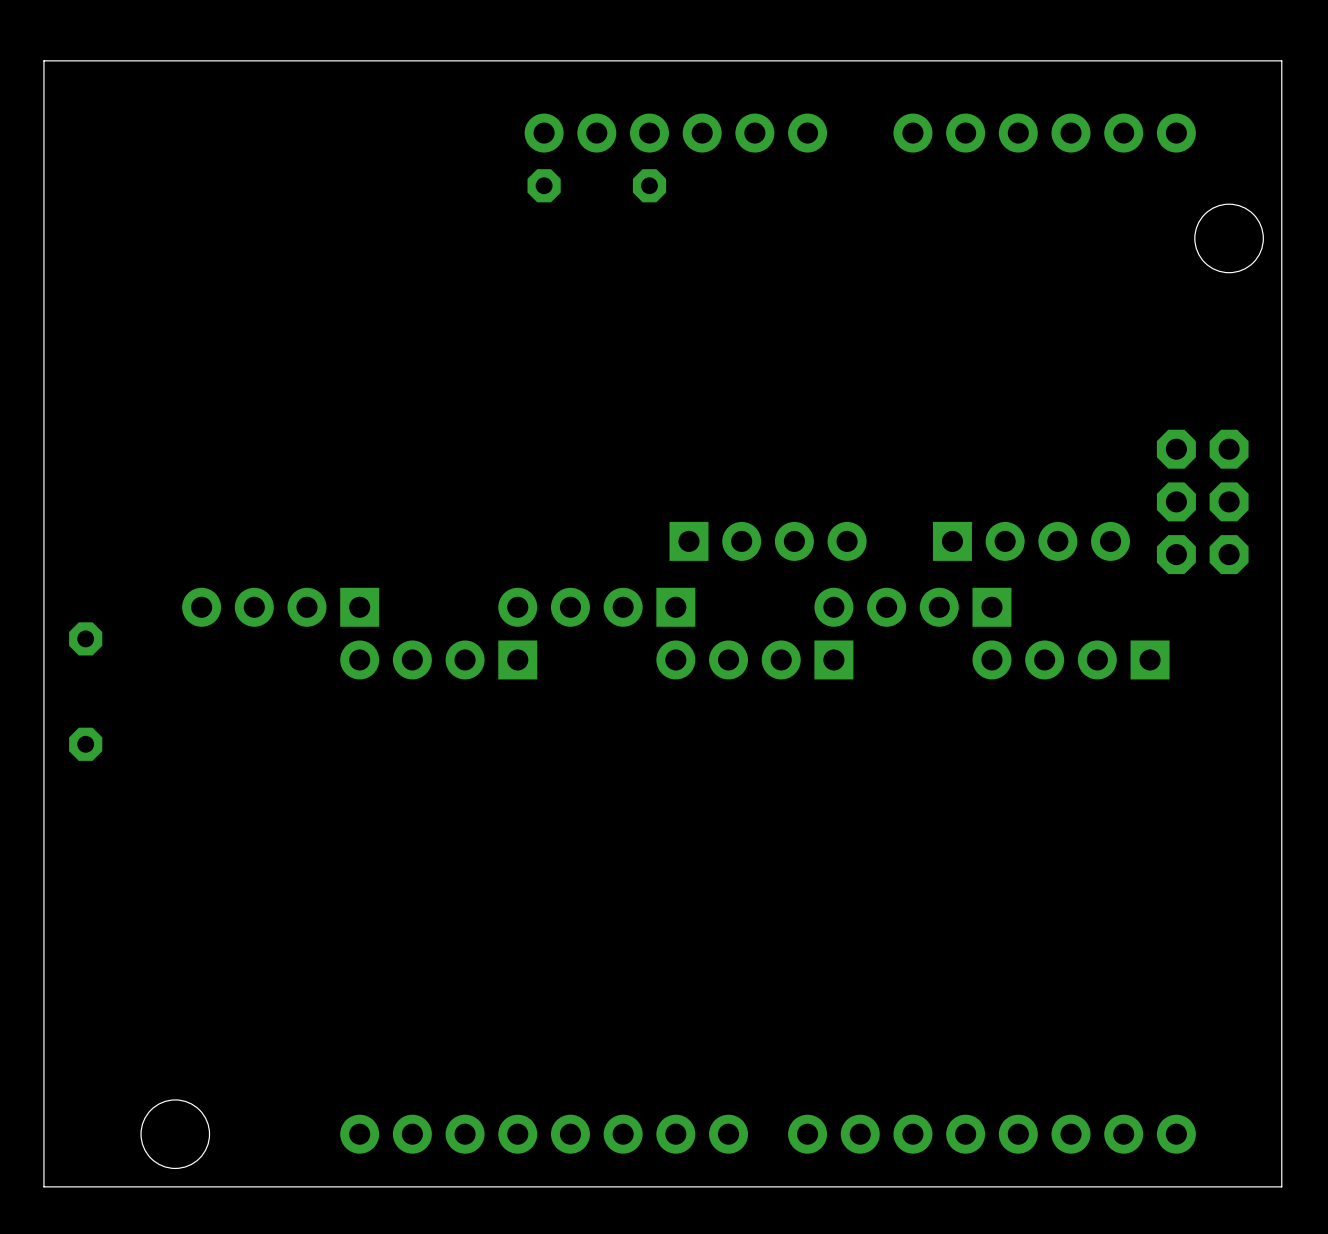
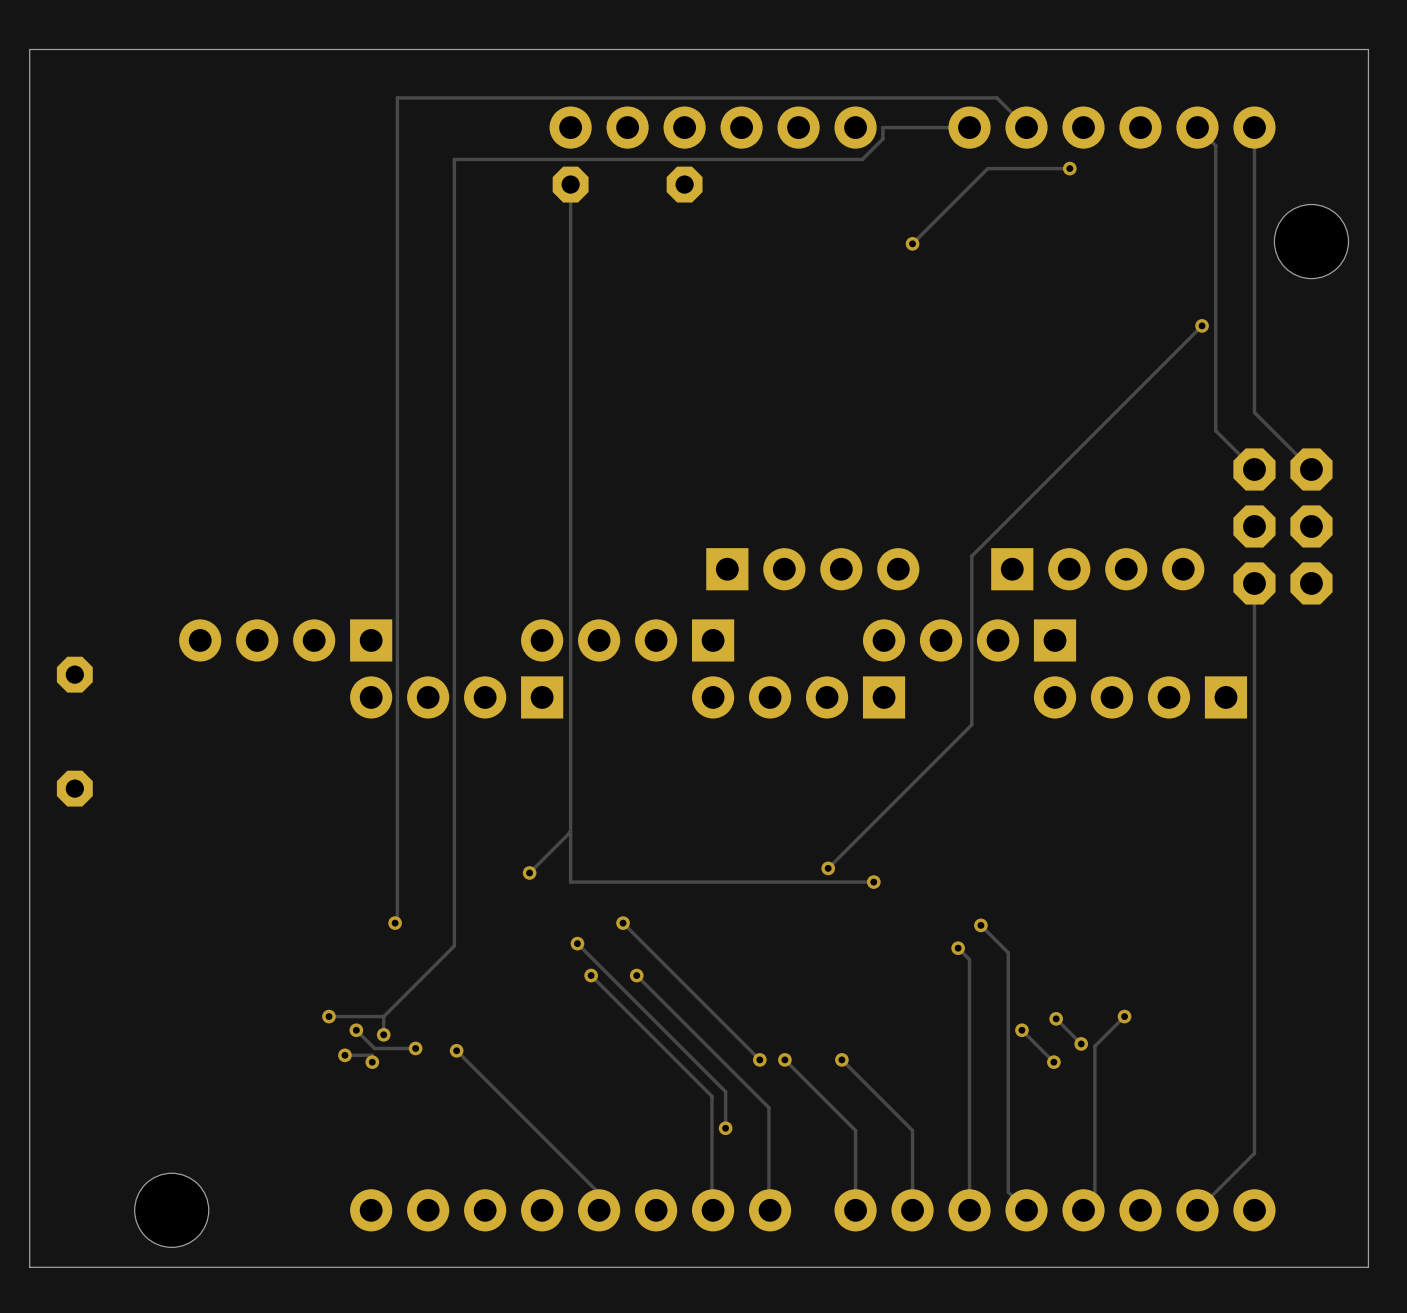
track: none -> (969, 127) (882, 127) (882, 138) (862, 159) (454, 159) (454, 945) (383, 1016)
track: none -> (1026, 127) (996, 97) (397, 97) (397, 920) (395, 923)
track: none -> (1197, 127) (1215, 145) (1215, 430) (1254, 469)
track: none -> (1254, 127) (1254, 412) (1311, 469)
track: none -> (1069, 168) (987, 168) (912, 243)
via: none -> (1069, 168)
track: none -> (570, 184) (570, 831) (529, 872)
via: none -> (912, 243)
track: none -> (1202, 325) (971, 556) (971, 724) (828, 868)
via: none -> (1202, 325)
track: none -> (1254, 583) (1254, 1153) (1197, 1210)
track: none -> (569, 833) (570, 882) (873, 882)
via: none -> (828, 868)
via: none -> (529, 872)
via: none -> (873, 882)
via: none -> (395, 923)
track: none -> (623, 923) (759, 1059)
via: none -> (623, 923)
track: none -> (980, 925) (1008, 952) (1008, 1192) (1026, 1210)
via: none -> (980, 925)
track: none -> (577, 943) (725, 1091) (725, 1128)
via: none -> (577, 943)
track: none -> (958, 948) (969, 959) (969, 1210)
via: none -> (958, 948)
track: none -> (591, 975) (711, 1096) (713, 1210)
via: none -> (591, 975)
track: none -> (636, 975) (768, 1107) (770, 1210)
via: none -> (636, 975)
via: none -> (329, 1016)
track: none -> (383, 1016) (329, 1016)
track: none -> (383, 1016) (383, 1034)
track: none -> (1124, 1016) (1094, 1046) (1094, 1198) (1083, 1210)
via: none -> (1124, 1016)
track: none -> (1056, 1018) (1081, 1043)
via: none -> (1056, 1018)
track: none -> (356, 1030) (374, 1048) (415, 1048)
via: none -> (356, 1030)
track: none -> (1021, 1030) (1053, 1062)
via: none -> (1021, 1030)
via: none -> (383, 1034)
via: none -> (1081, 1043)
via: none -> (415, 1048)
track: none -> (456, 1050) (597, 1192) (599, 1210)
via: none -> (456, 1050)
track: none -> (344, 1055) (372, 1055) (372, 1062)
via: none -> (344, 1055)
via: none -> (759, 1059)
track: none -> (784, 1059) (855, 1130) (855, 1210)
via: none -> (784, 1059)
track: none -> (841, 1059) (912, 1130) (912, 1210)
via: none -> (841, 1059)
via: none -> (372, 1062)
via: none -> (1053, 1062)
via: none -> (725, 1128)

